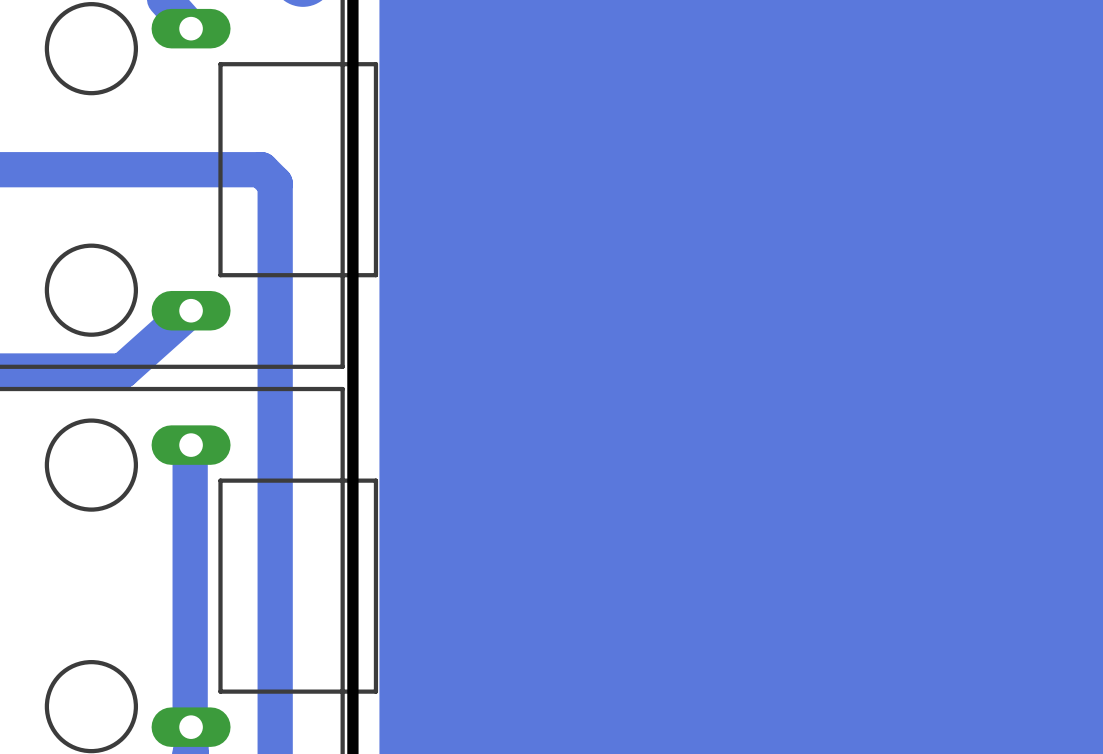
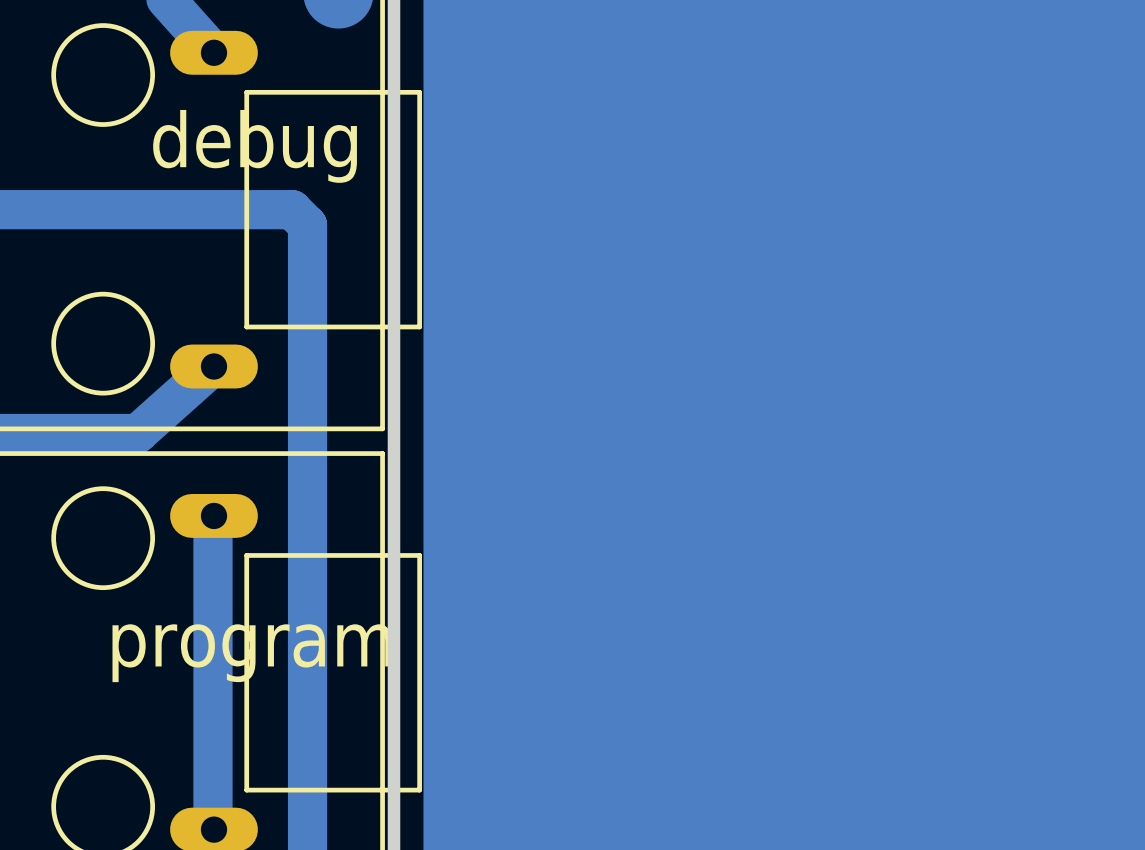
text: none -> debug (255, 146)
text: none -> program (251, 653)

